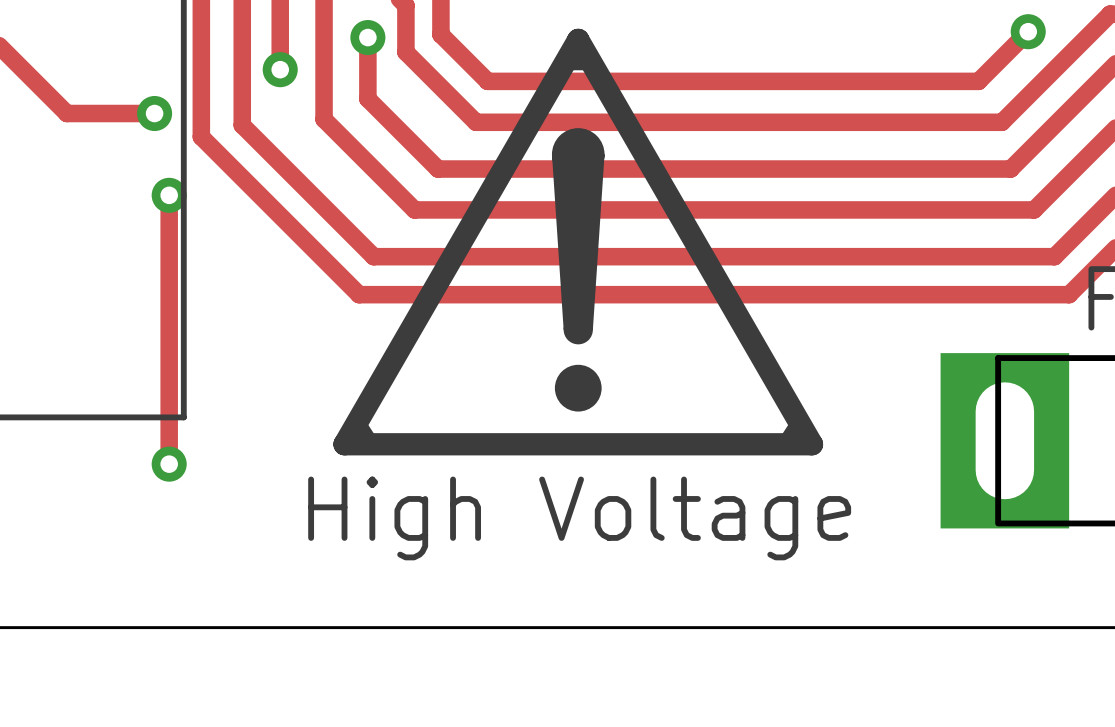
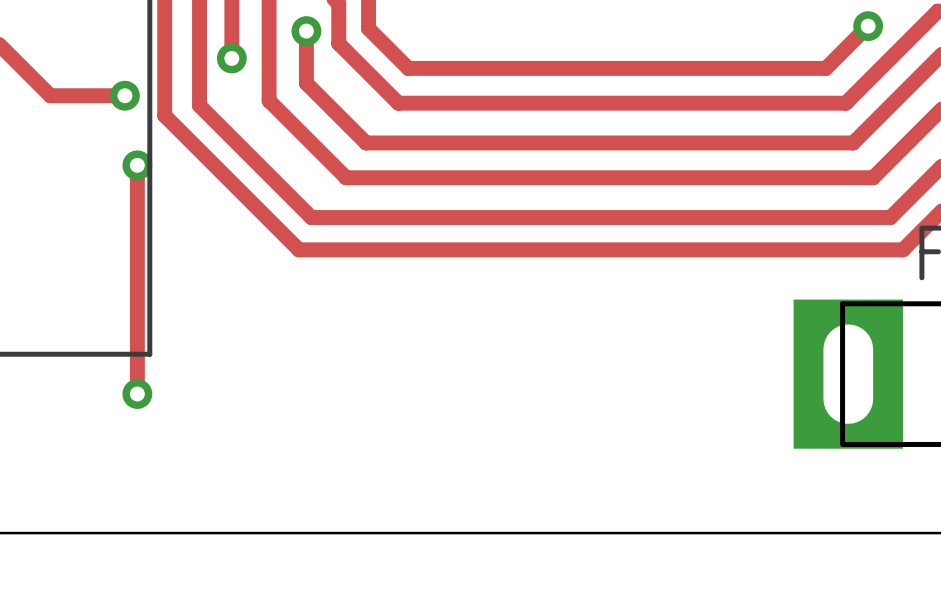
drawing: [333, 28, 824, 456] -> none
text: High Voltage (579, 518) -> none

